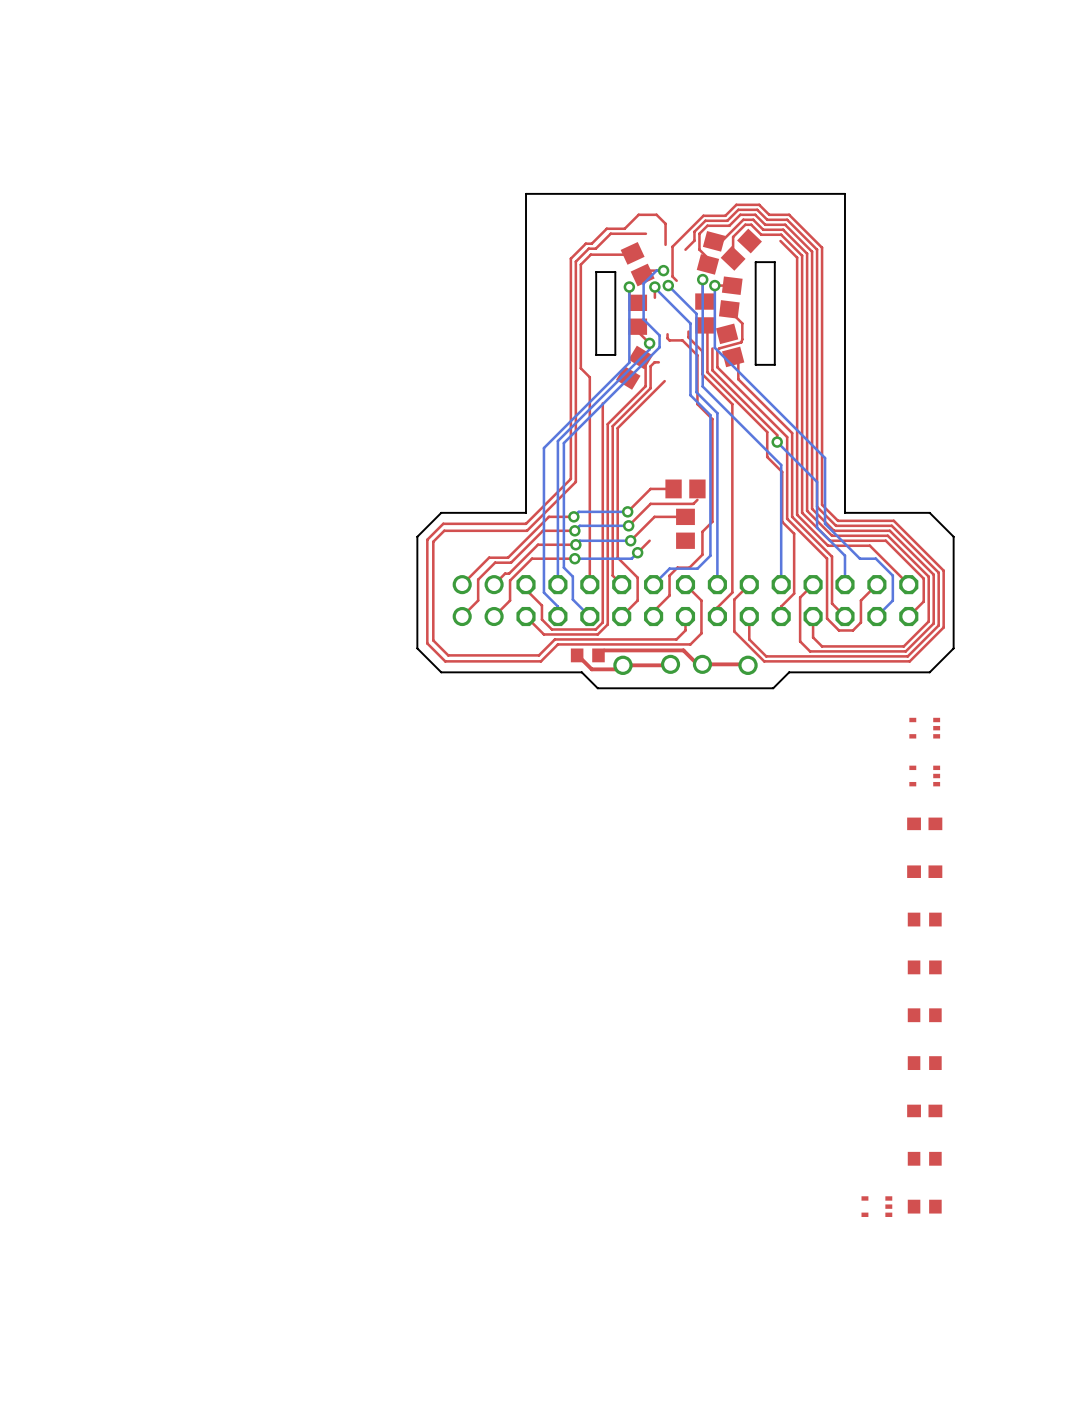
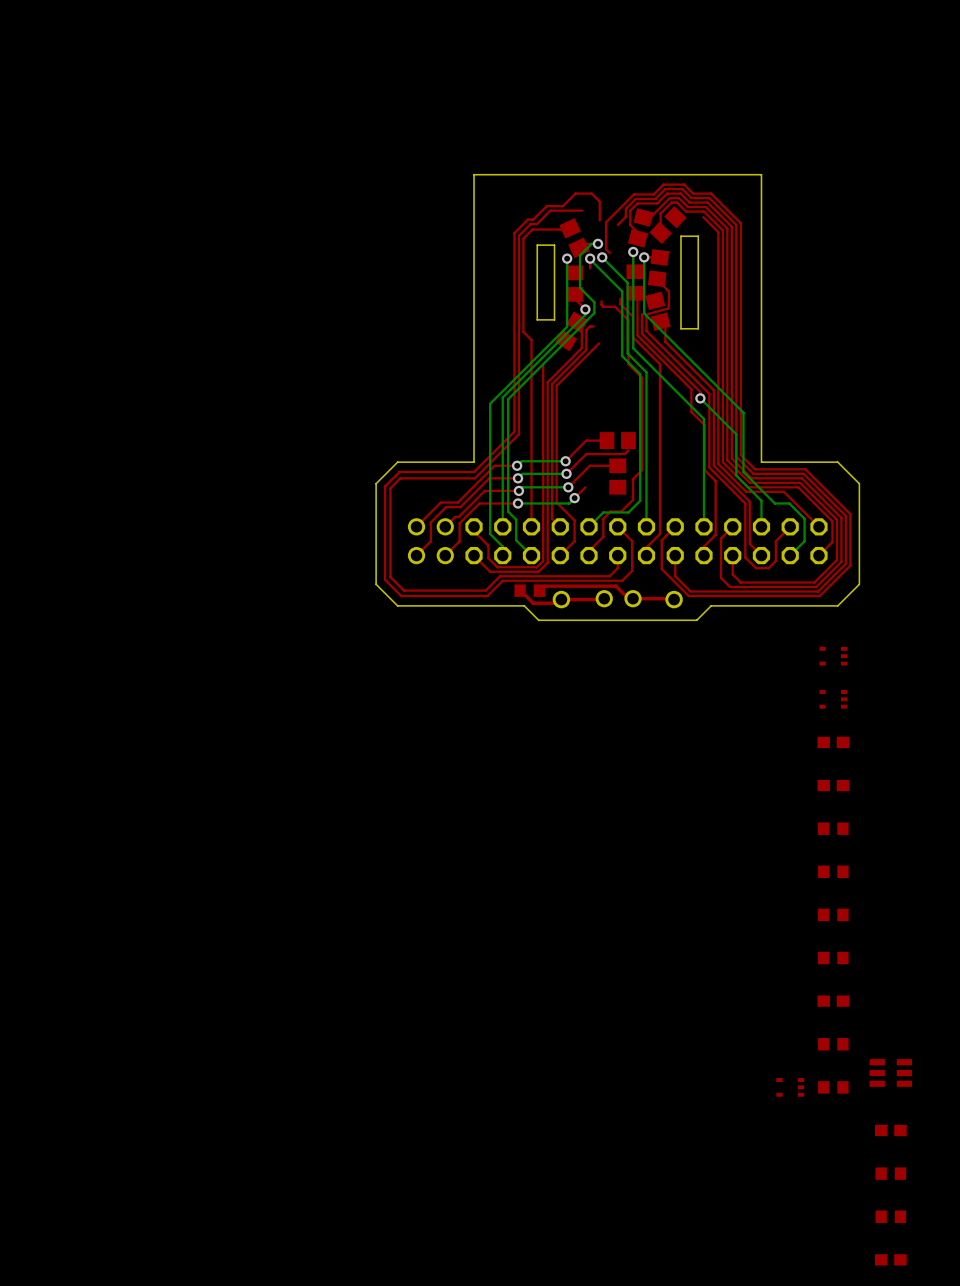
part: none -> (890, 1073)
part: none -> (890, 1130)
part: none -> (890, 1173)
part: none -> (890, 1216)
part: none -> (890, 1259)

